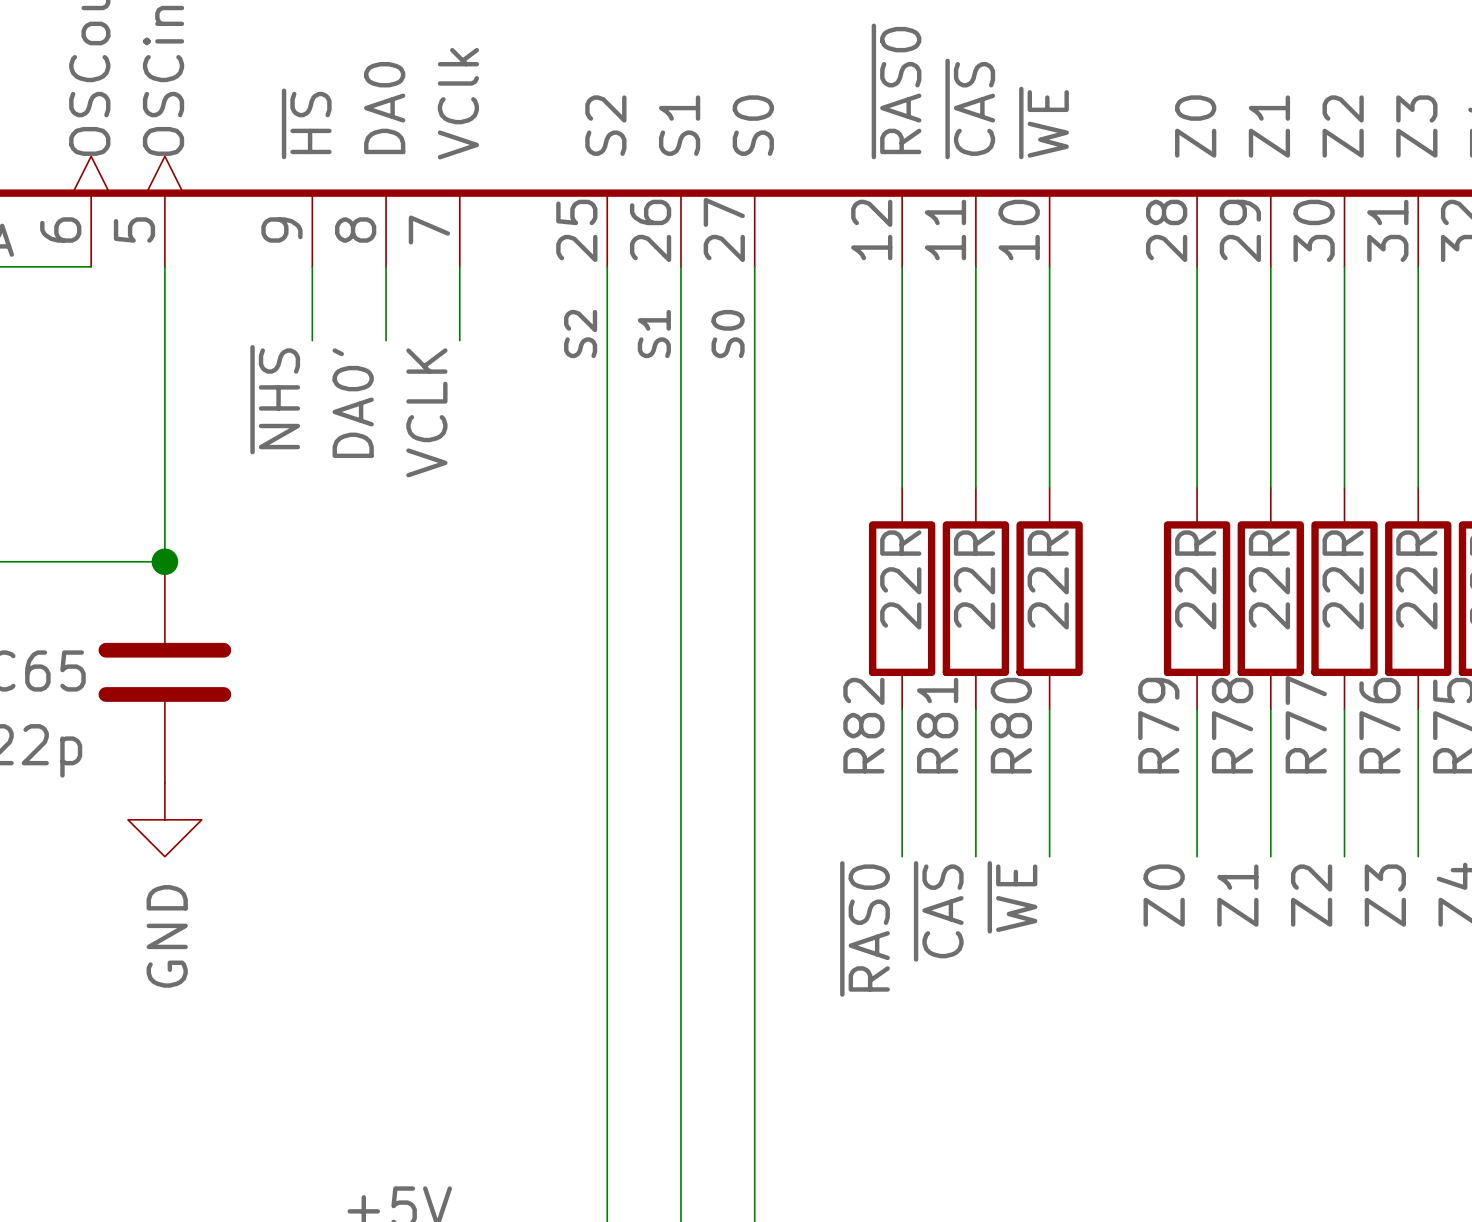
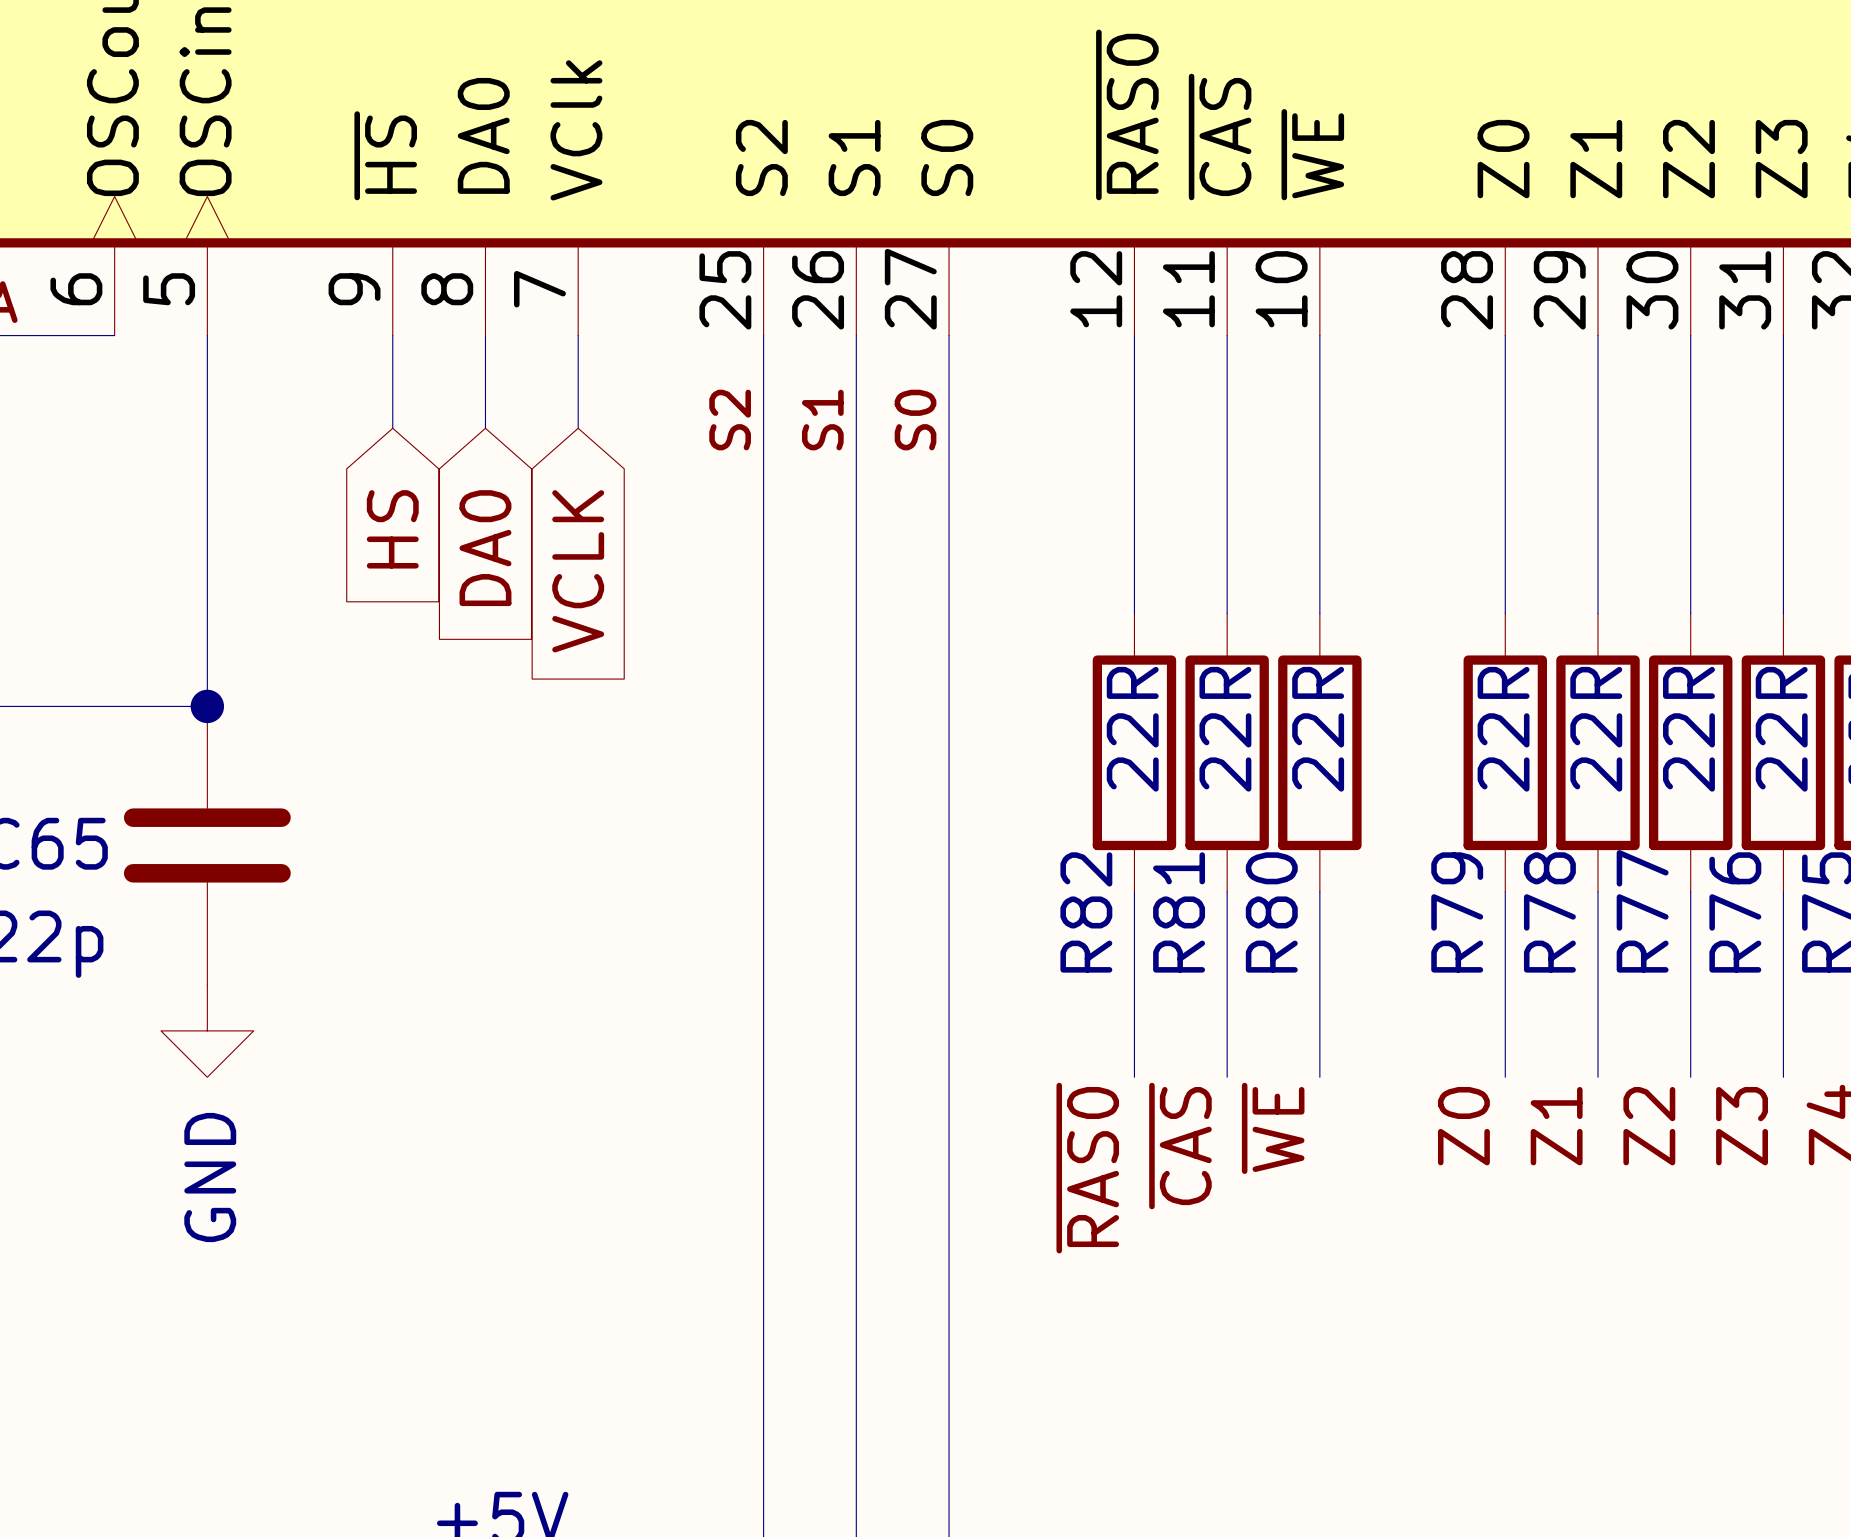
label: ~{NHS} (275, 399) -> none
label: DA0' (353, 403) -> none
label: VCLK (426, 412) -> none
global label: none -> HS (392, 529)
global label: none -> DA0 (485, 548)
global label: none -> VCLK (578, 571)

